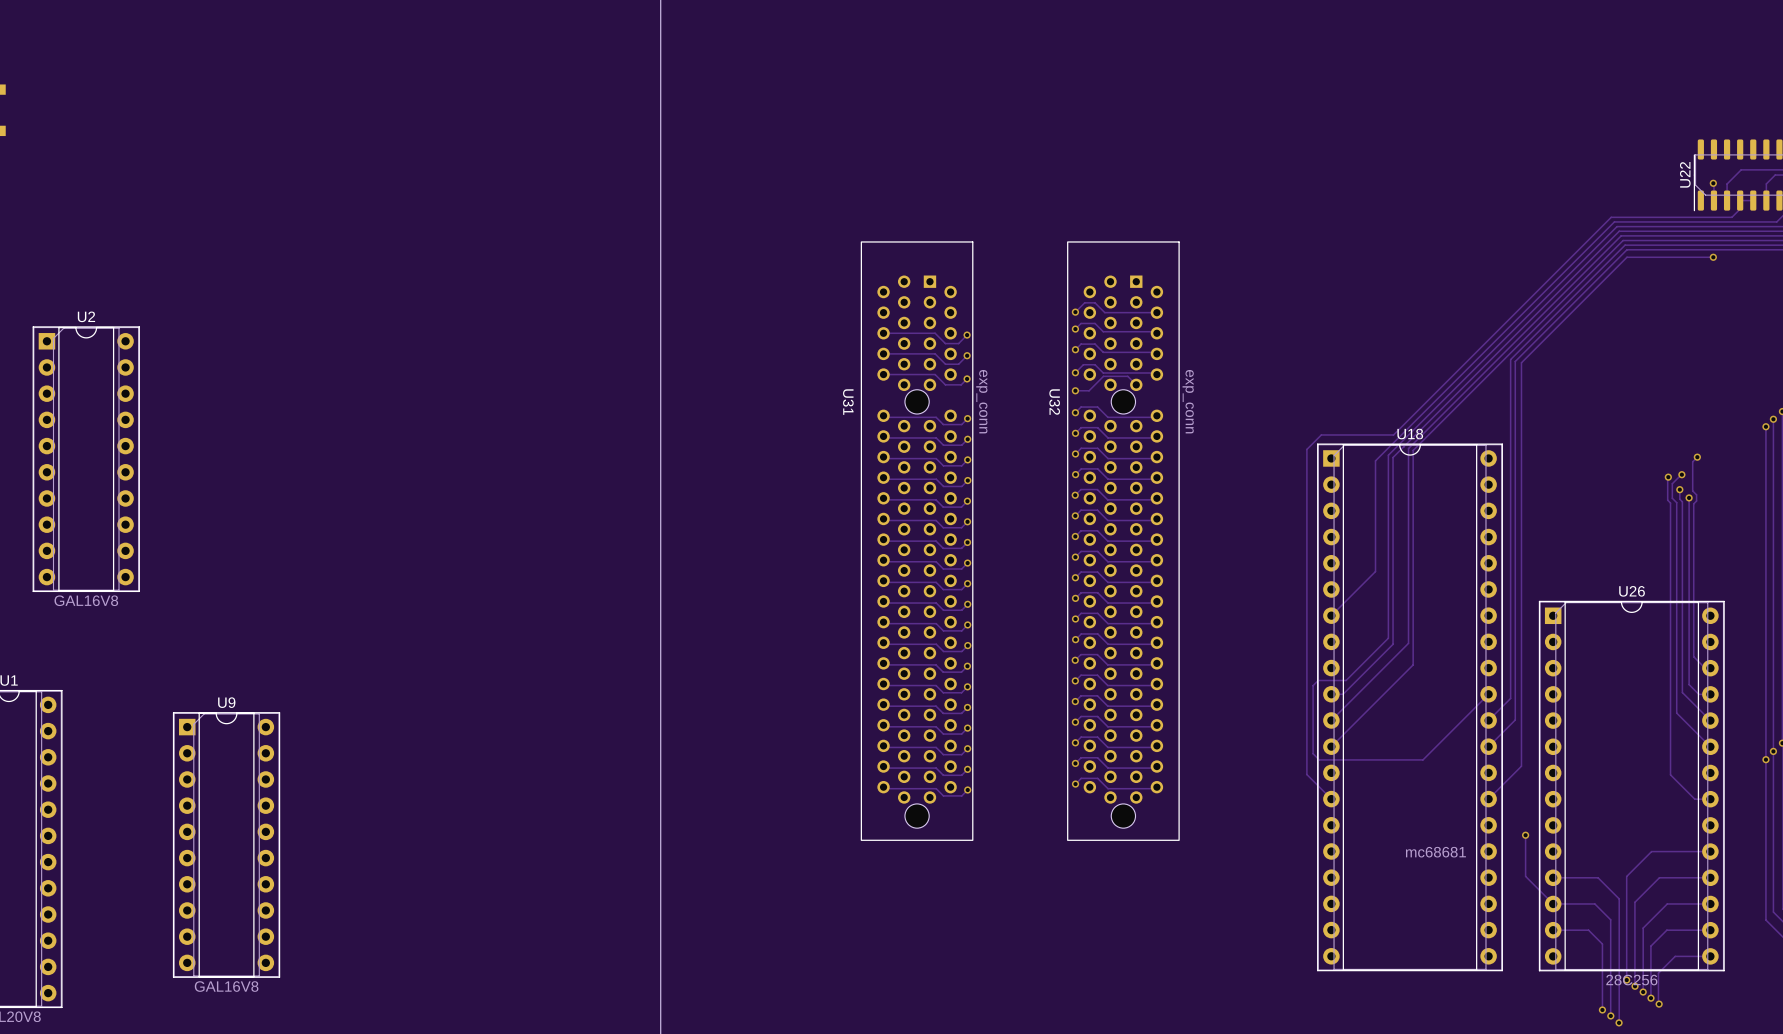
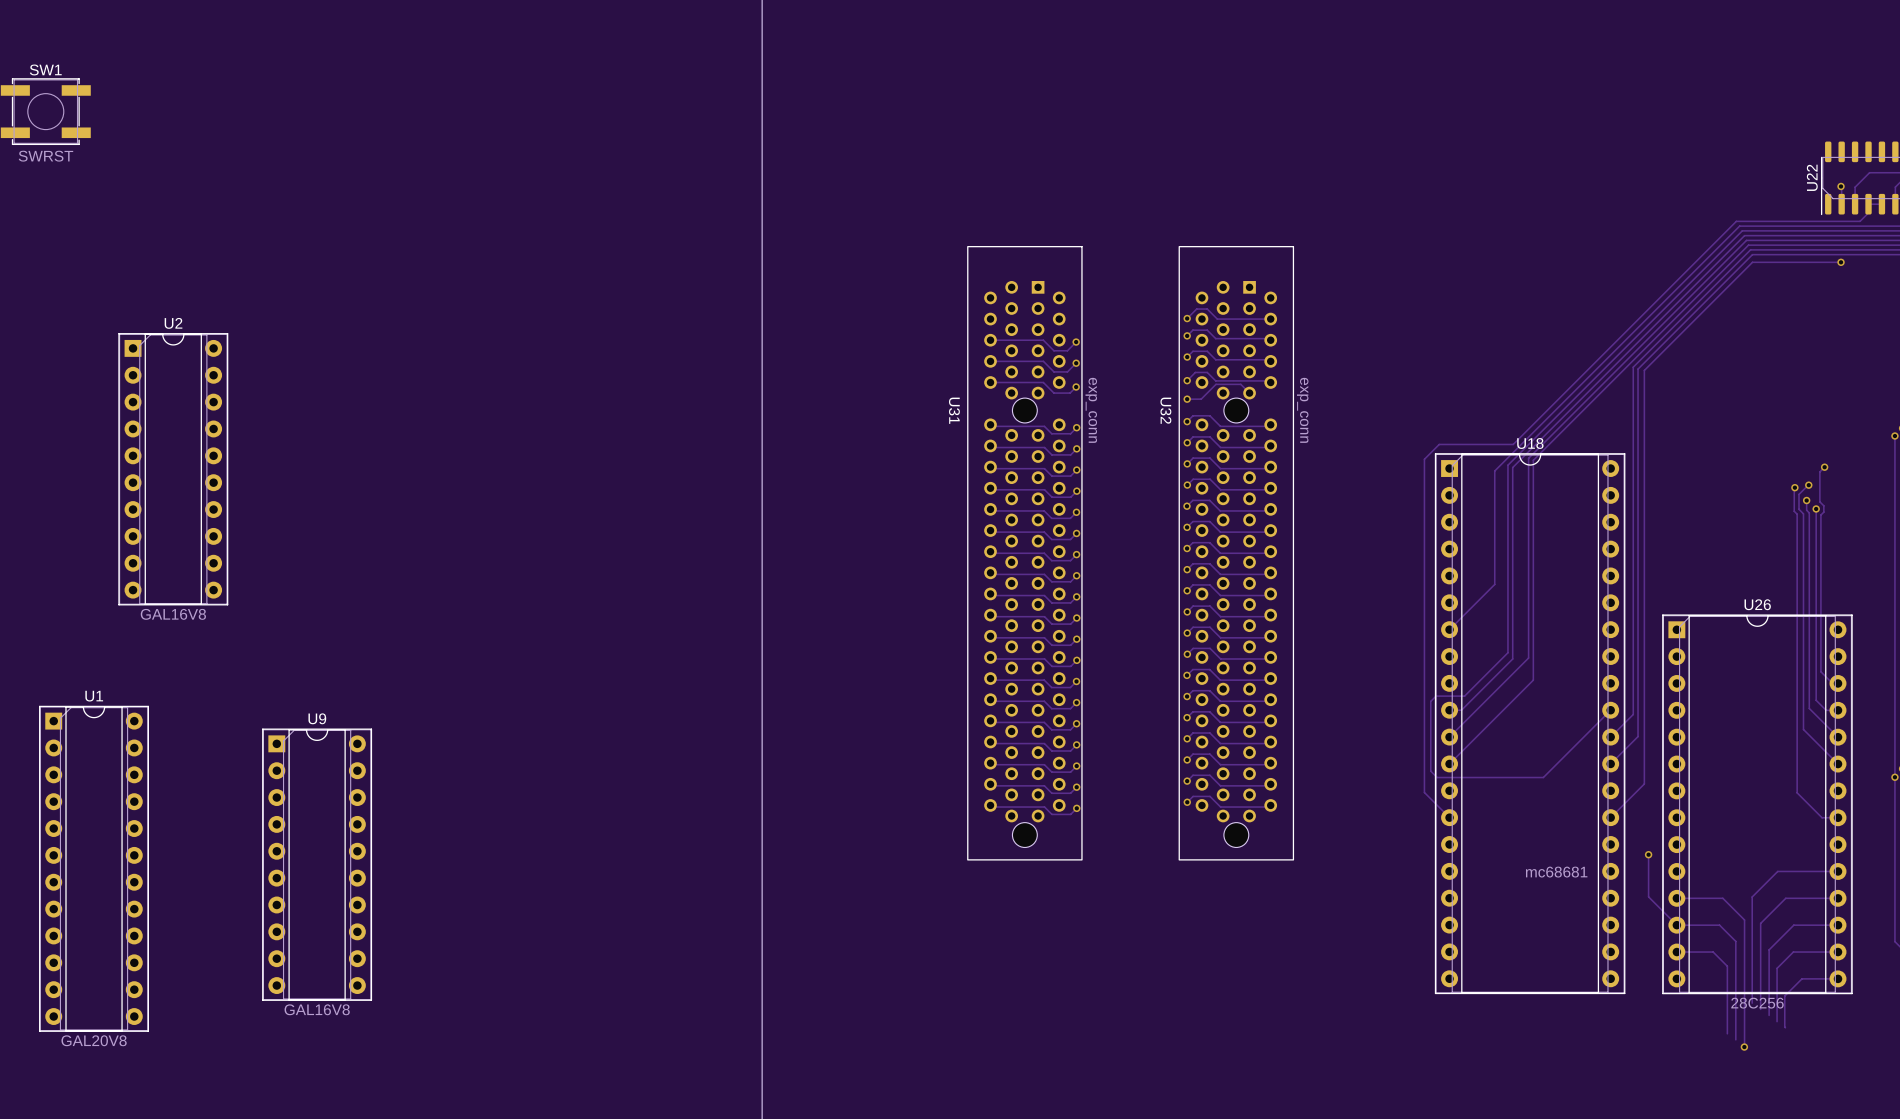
via: (1626, 980) -> none
via: (1635, 986) -> none
via: (1643, 992) -> none
via: (1650, 998) -> none
via: (1659, 1004) -> none
via: (1602, 1009) -> none
via: (1610, 1015) -> none

